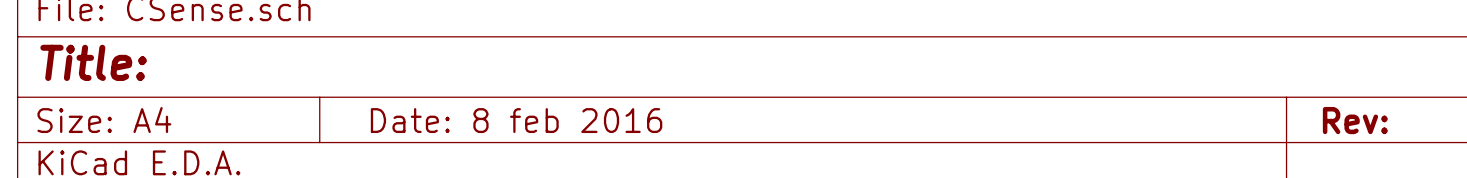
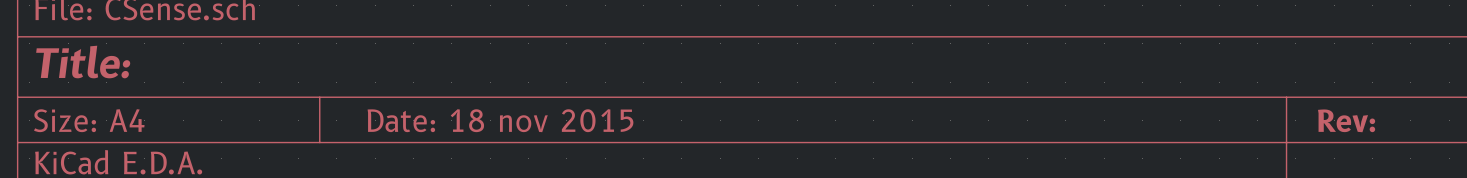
title block: Date: 8 feb 2016 (516, 120) -> Date: 18 nov 2015 (500, 120)

